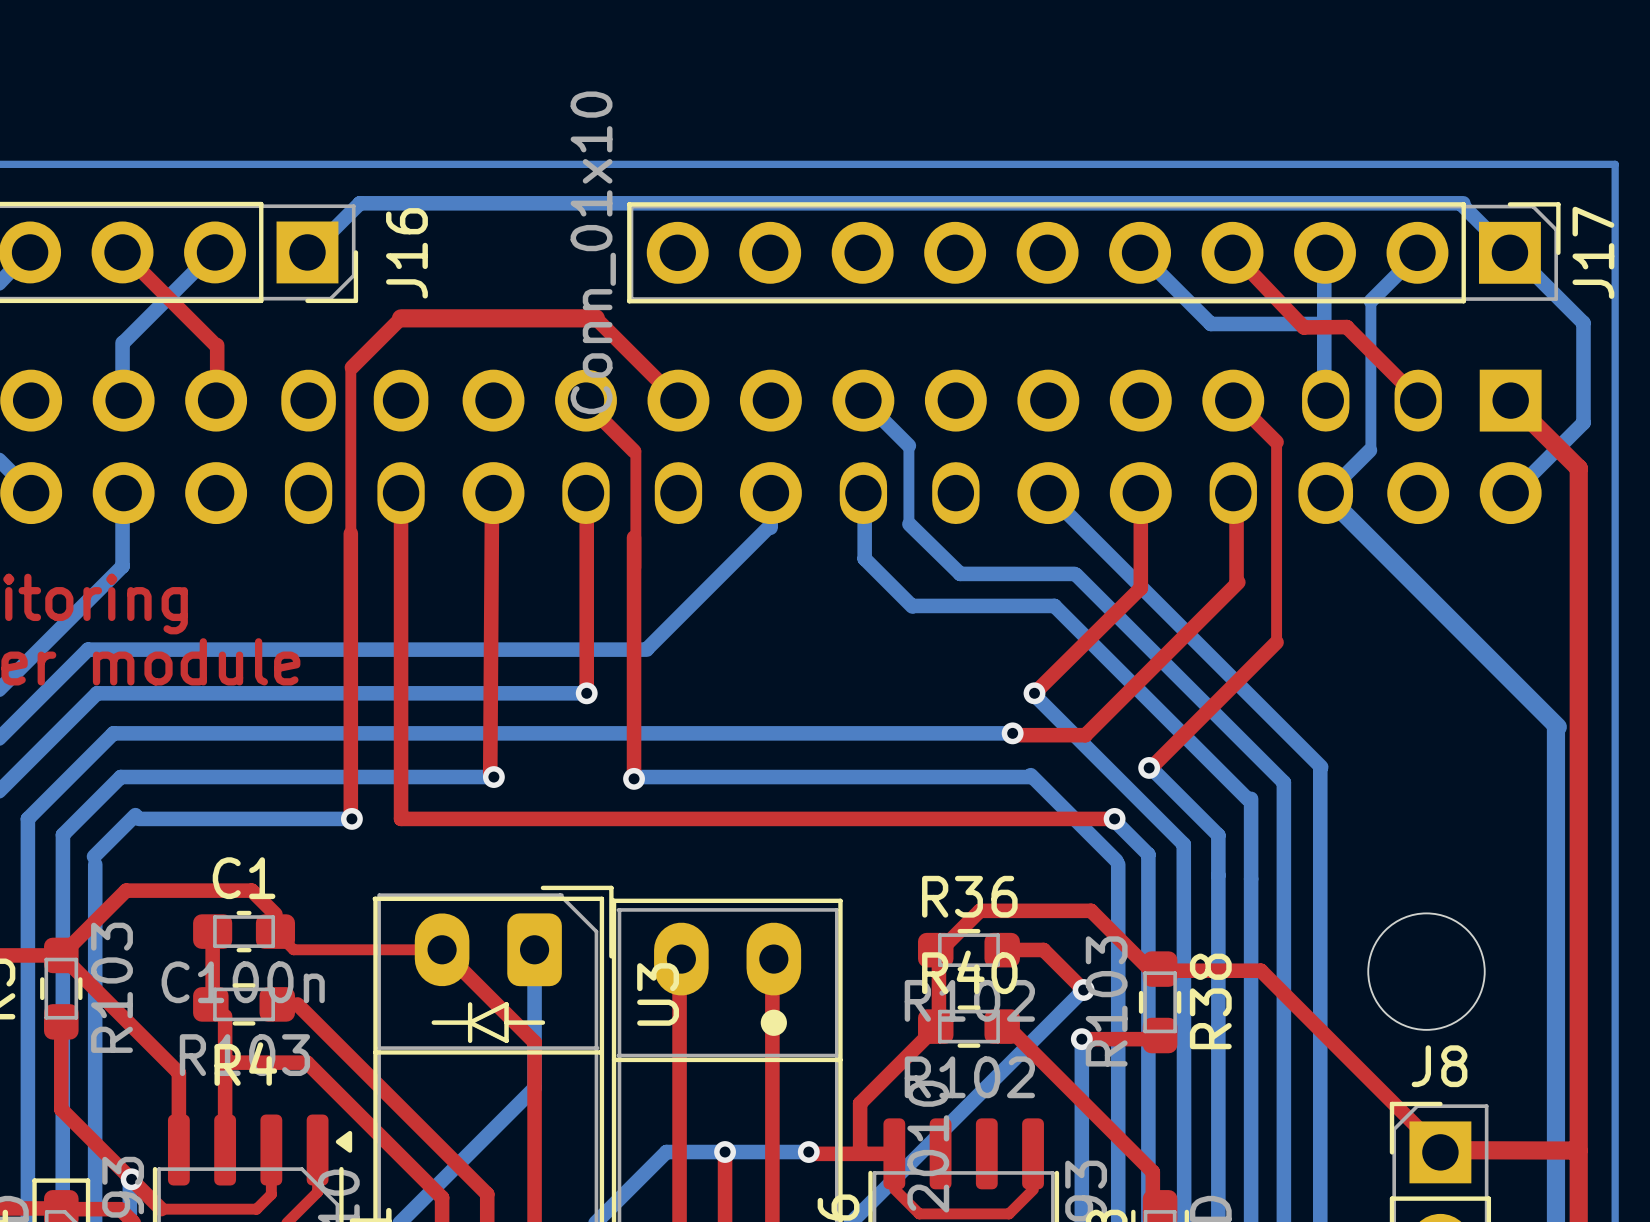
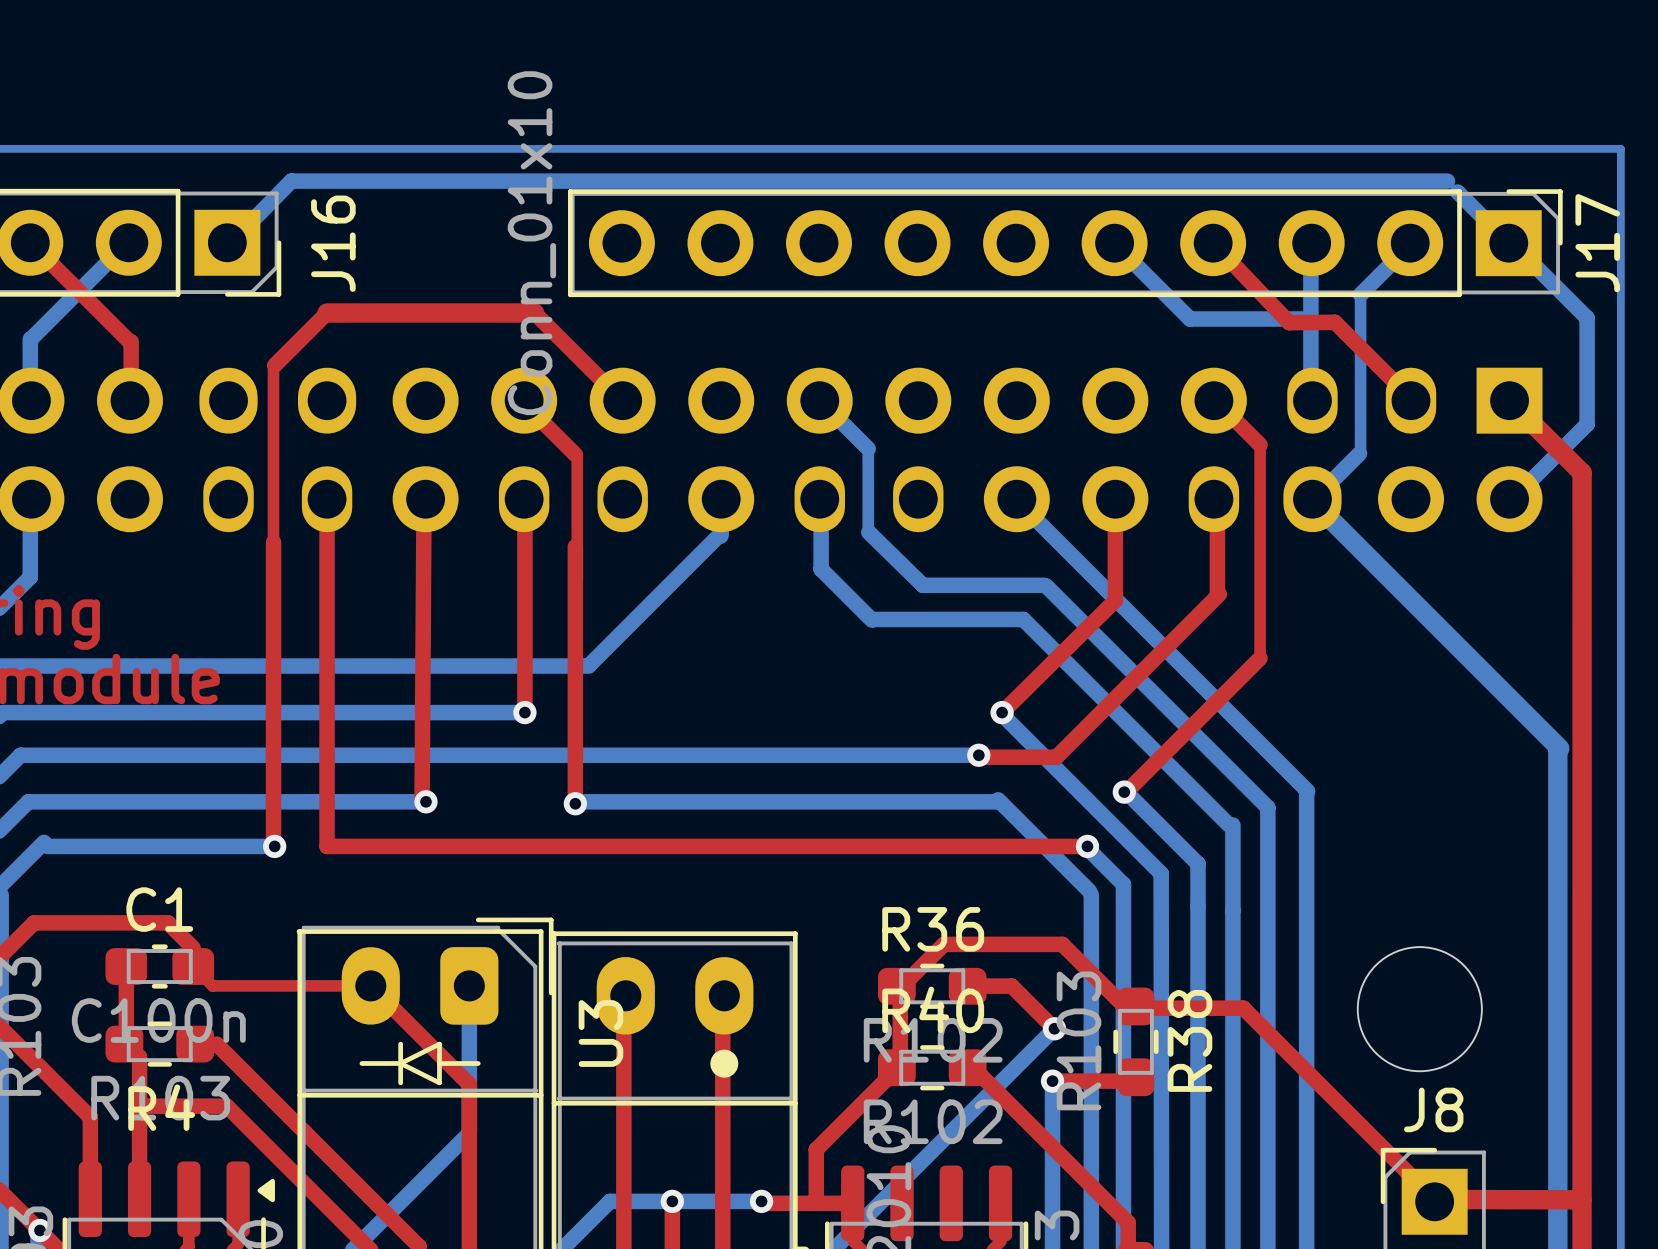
bottom track: (1463, 203) (359, 203) (308, 254) -> (1447, 181) (291, 181) (228, 245)

